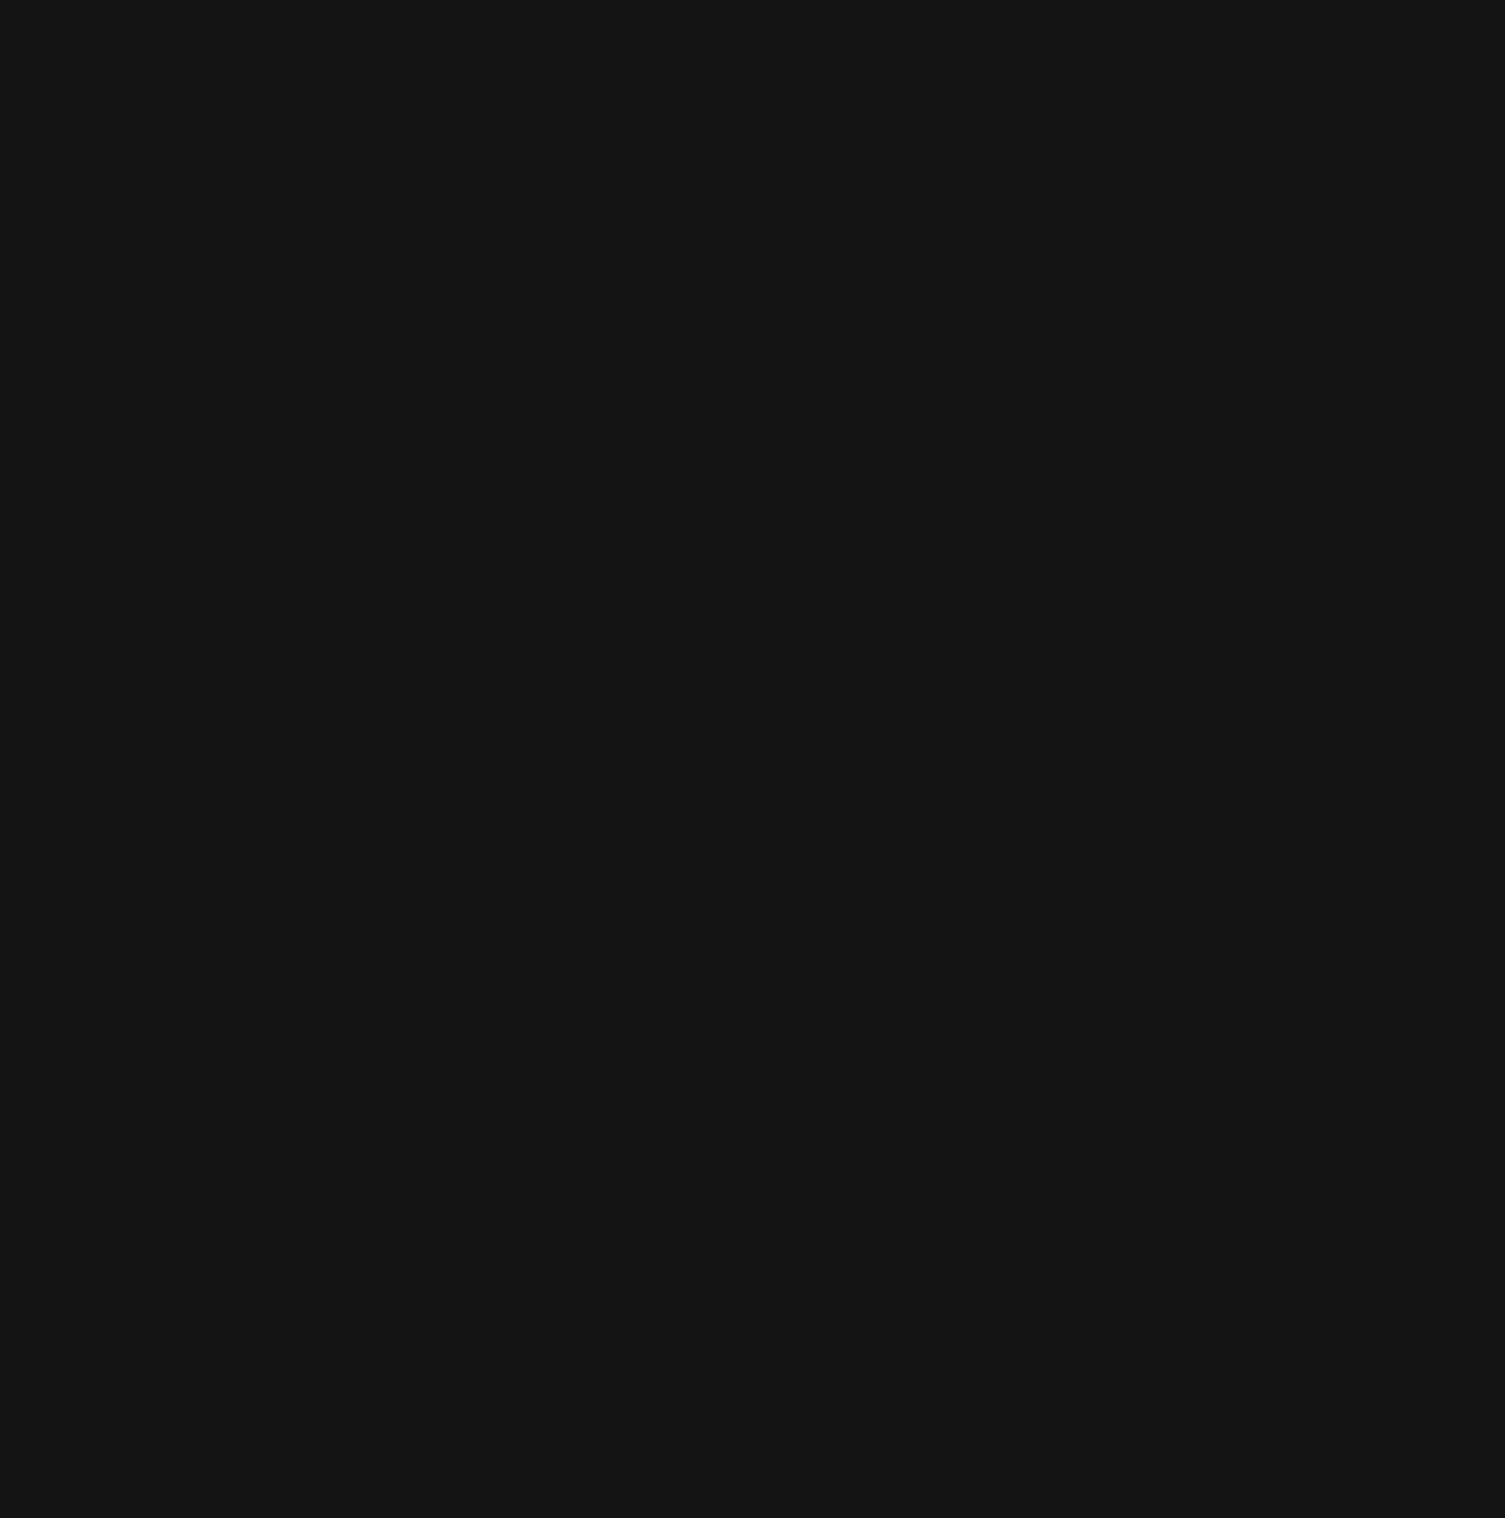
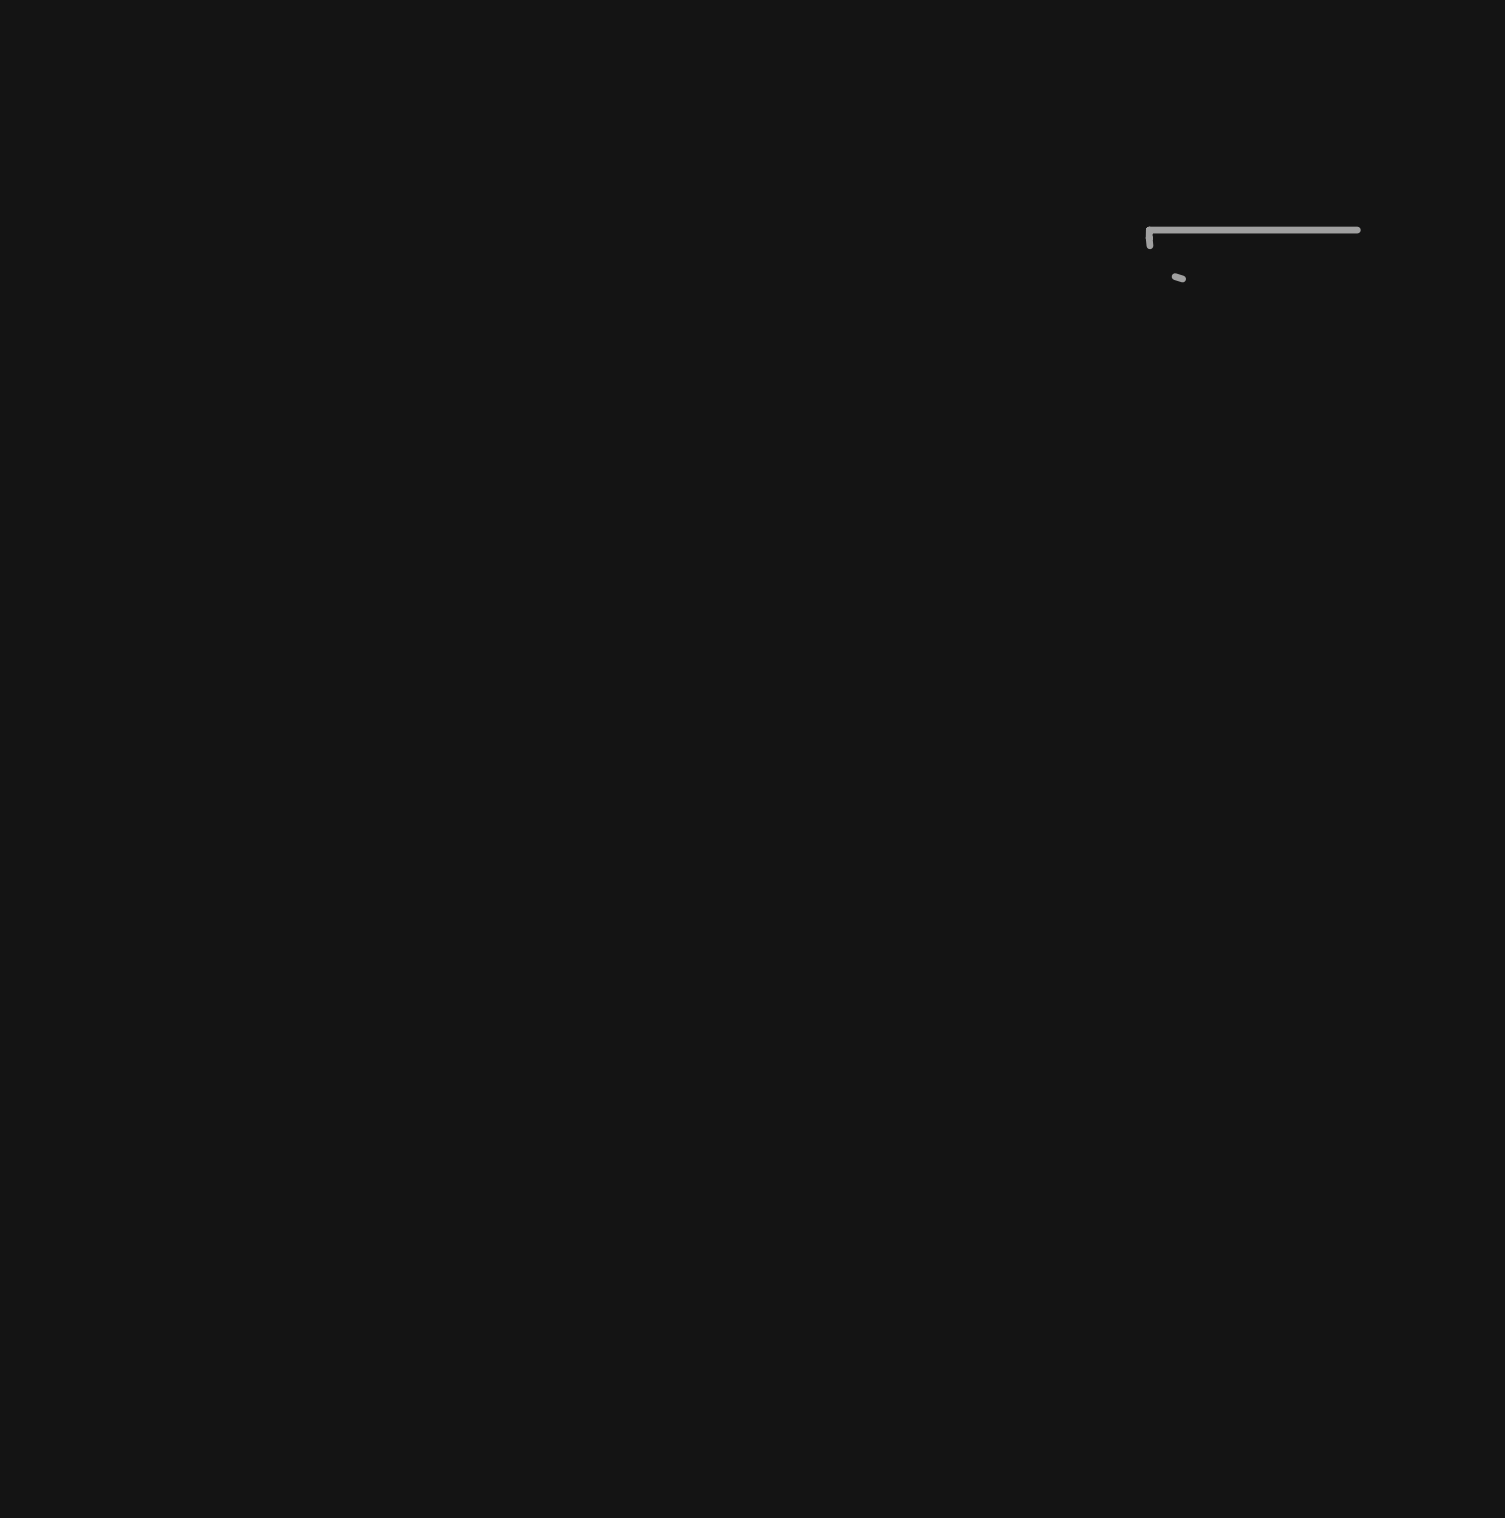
board edge: none -> (1357, 230) (1149, 230) (1149, 245)
board edge: none -> (1175, 276) (1182, 278)

